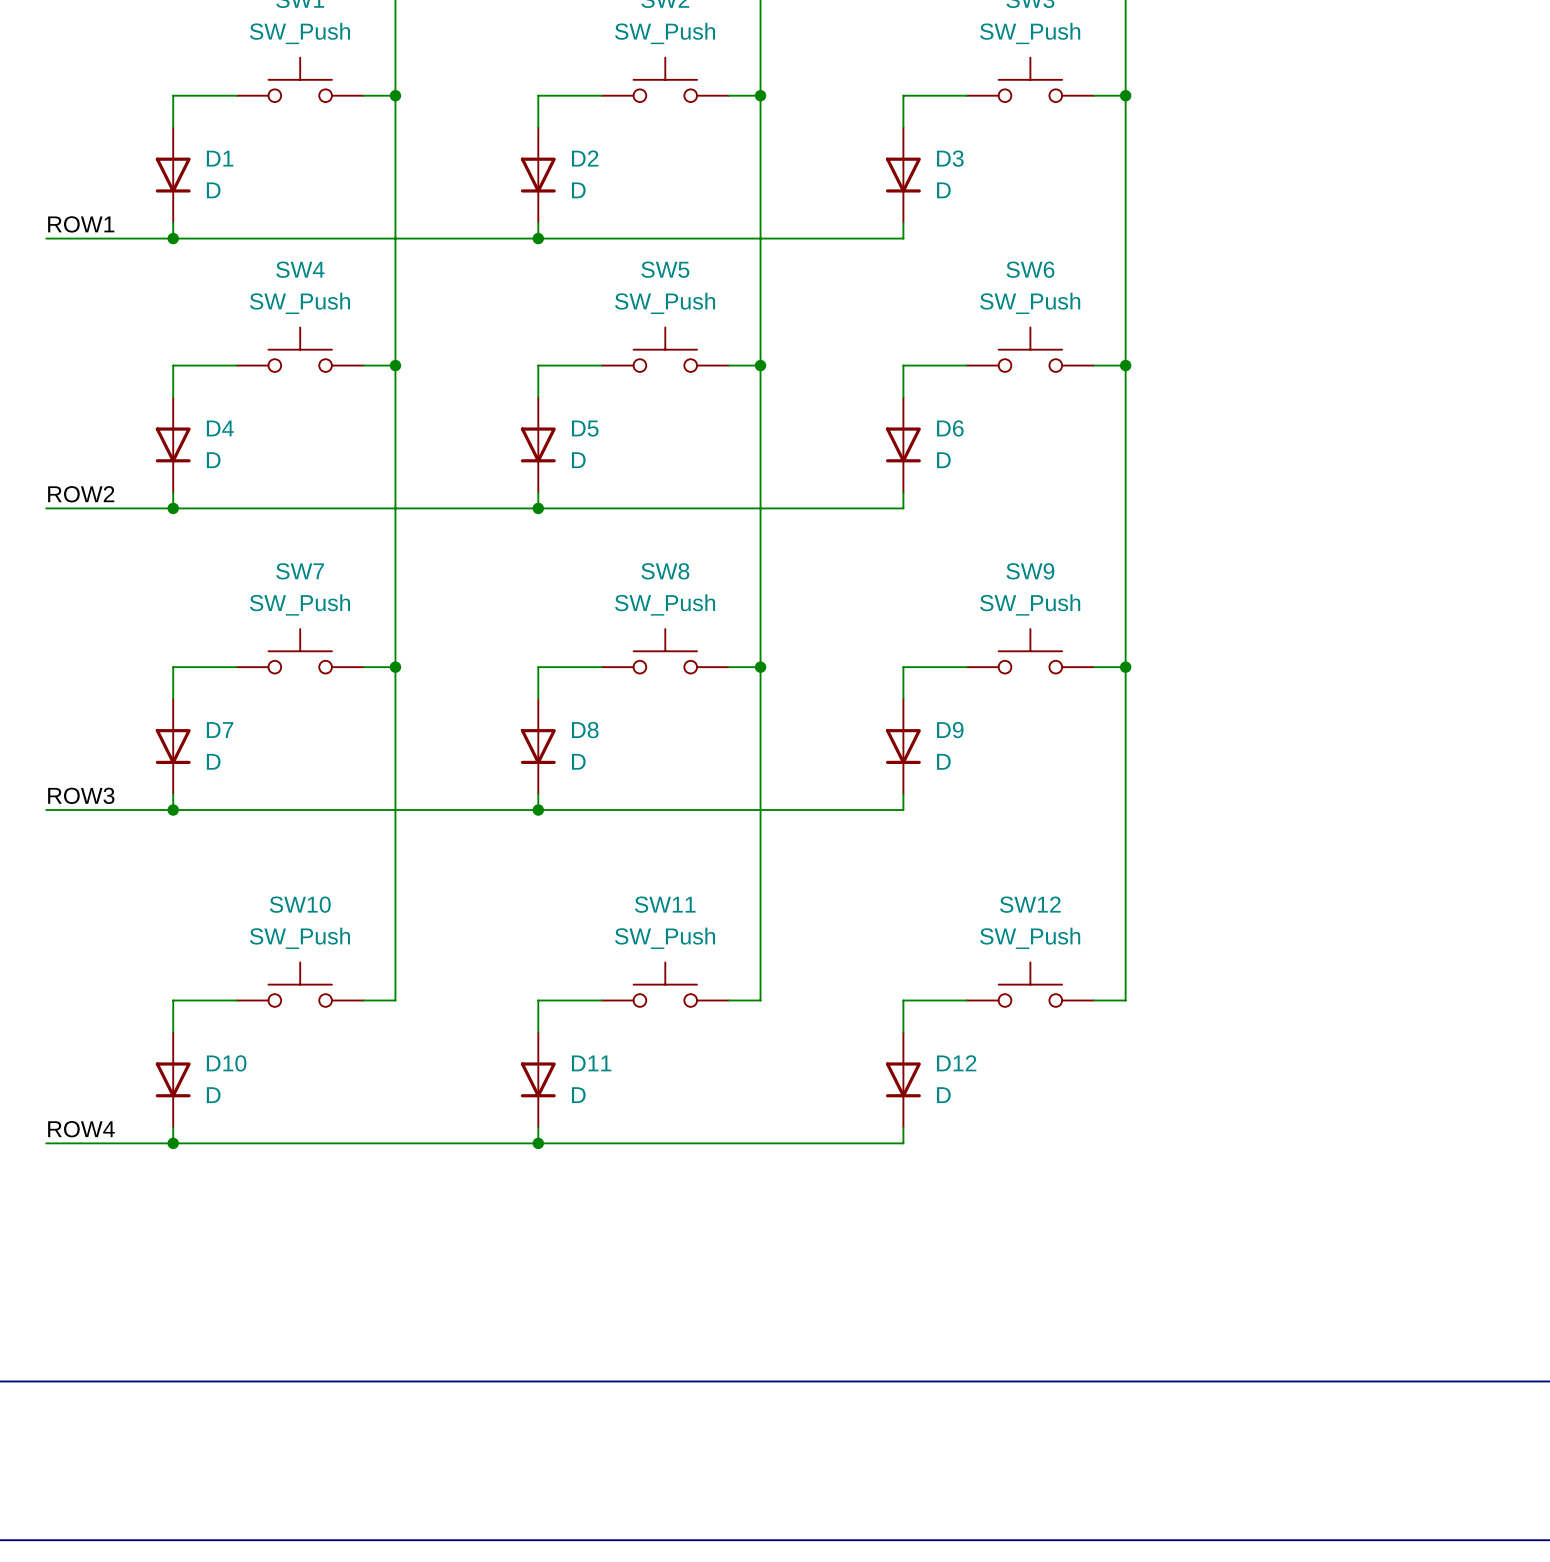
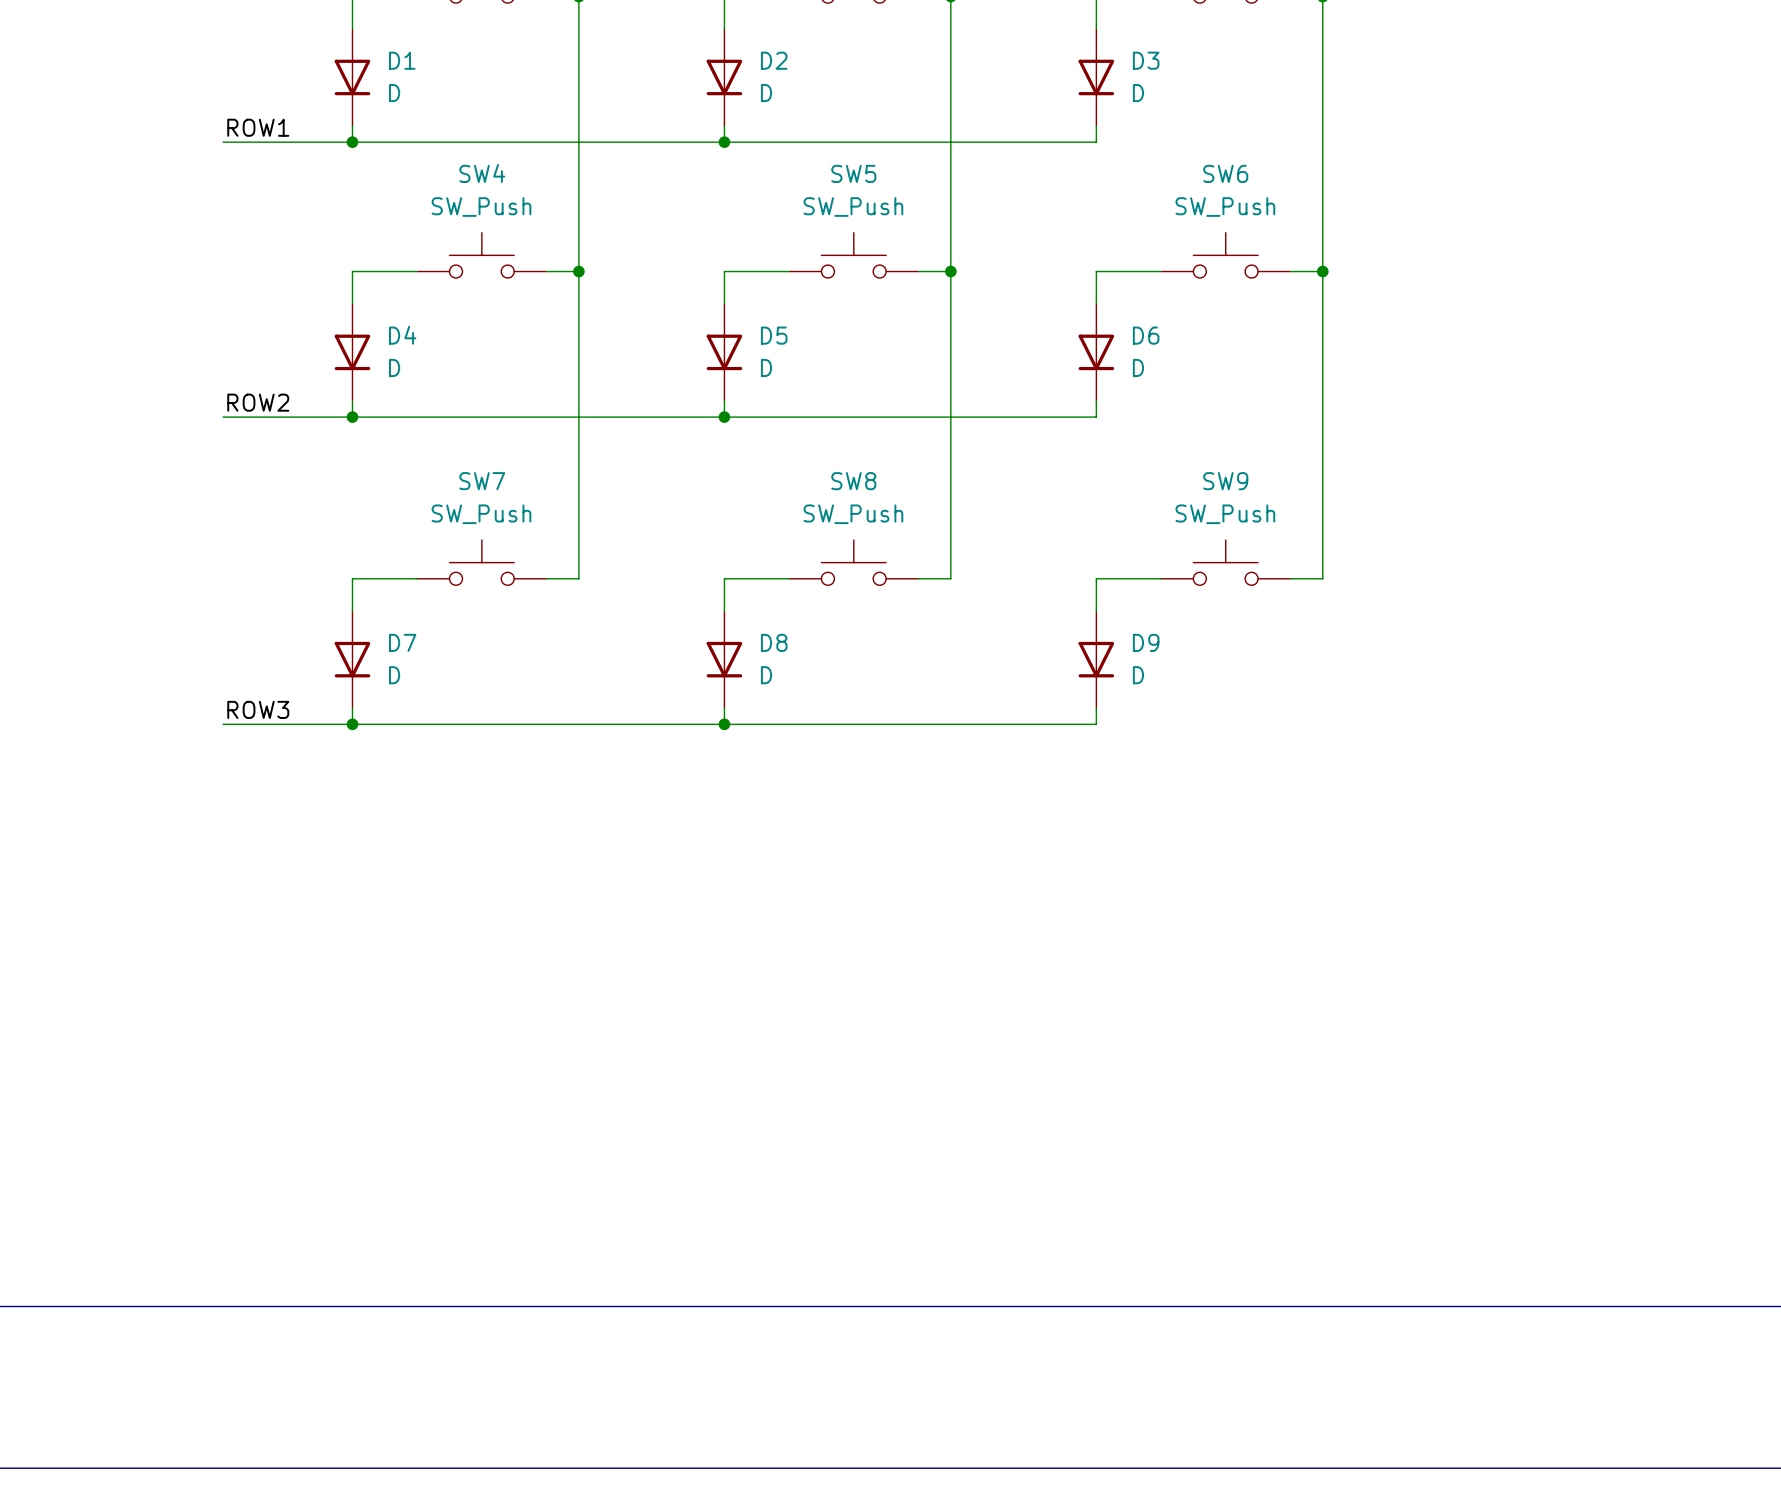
wire: (395, 667) (395, 1000) (363, 1000) -> none
junction: (395, 667) -> none
wire: (760, 667) (760, 1000) (728, 1000) -> none
junction: (760, 667) -> none
wire: (1125, 667) (1125, 1000) (1093, 1000) -> none
junction: (1125, 667) -> none
SW10: SW_Push (300, 984) -> none
SW11: SW_Push (665, 984) -> none
SW12: SW_Push (1030, 984) -> none
wire: (236, 1000) (173, 1000) (173, 1032) -> none
wire: (601, 1000) (538, 1000) (538, 1032) -> none
wire: (966, 1000) (903, 1000) (903, 1032) -> none
D10: D (173, 1079) -> none
D11: D (538, 1079) -> none
D12: D (903, 1079) -> none
wire: (173, 1127) (173, 1143) -> none
wire: (538, 1127) (538, 1143) -> none
wire: (903, 1127) (903, 1143) (46, 1143) -> none
label: ROW4 (81, 1129) -> none
junction: (173, 1143) -> none
junction: (538, 1143) -> none

